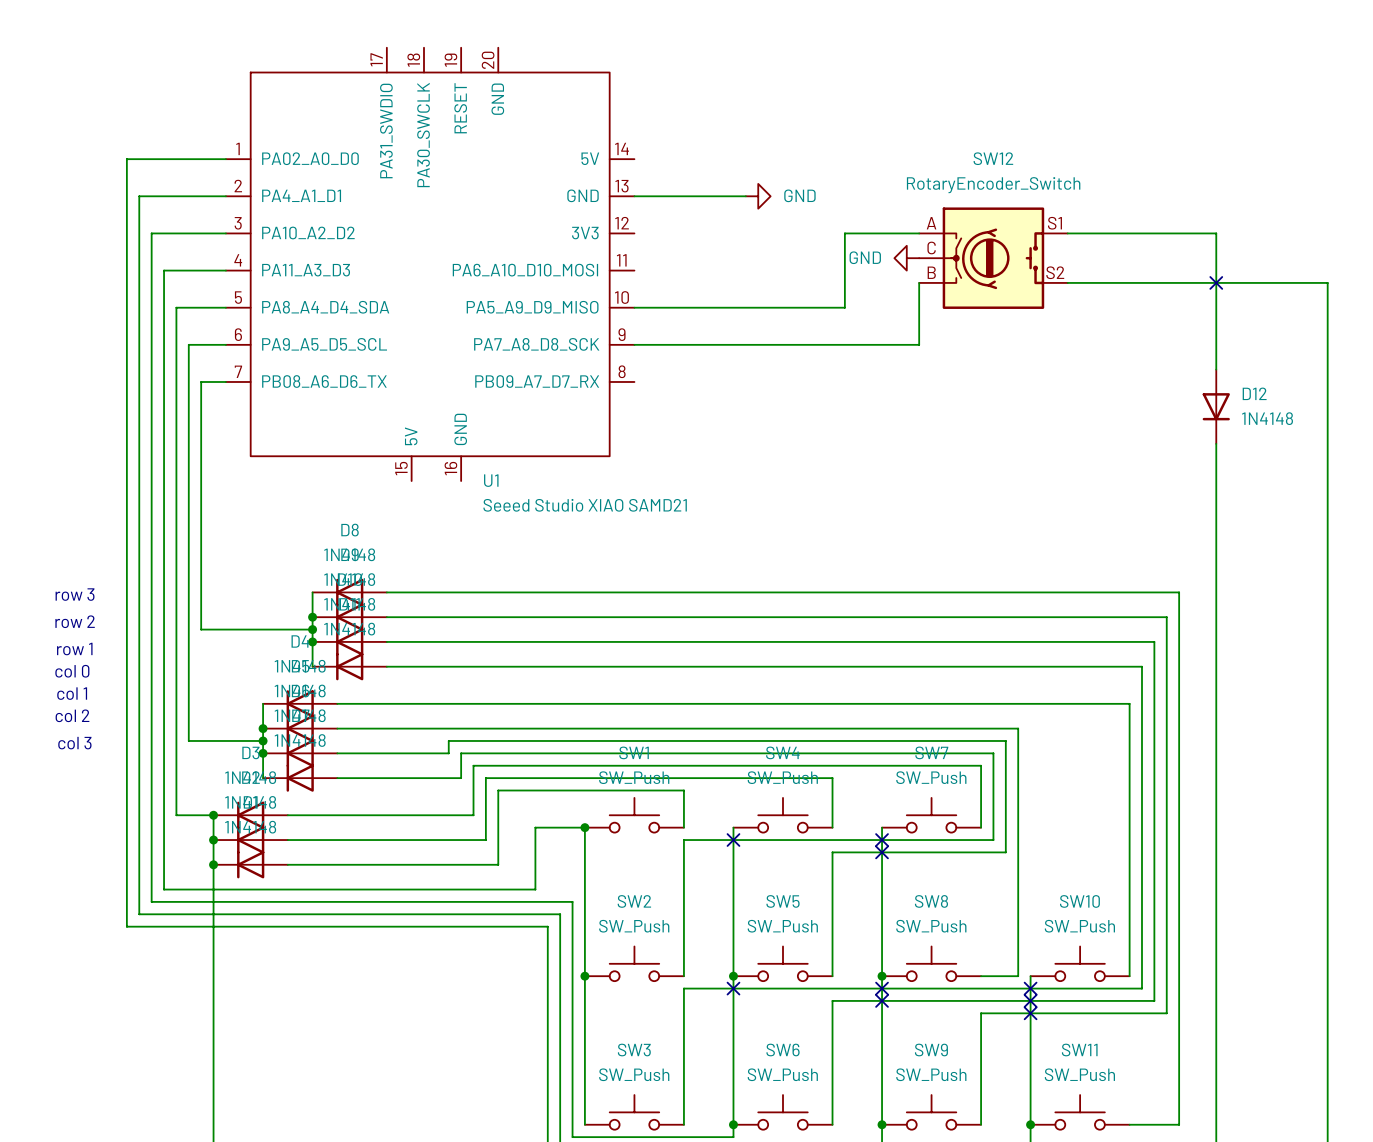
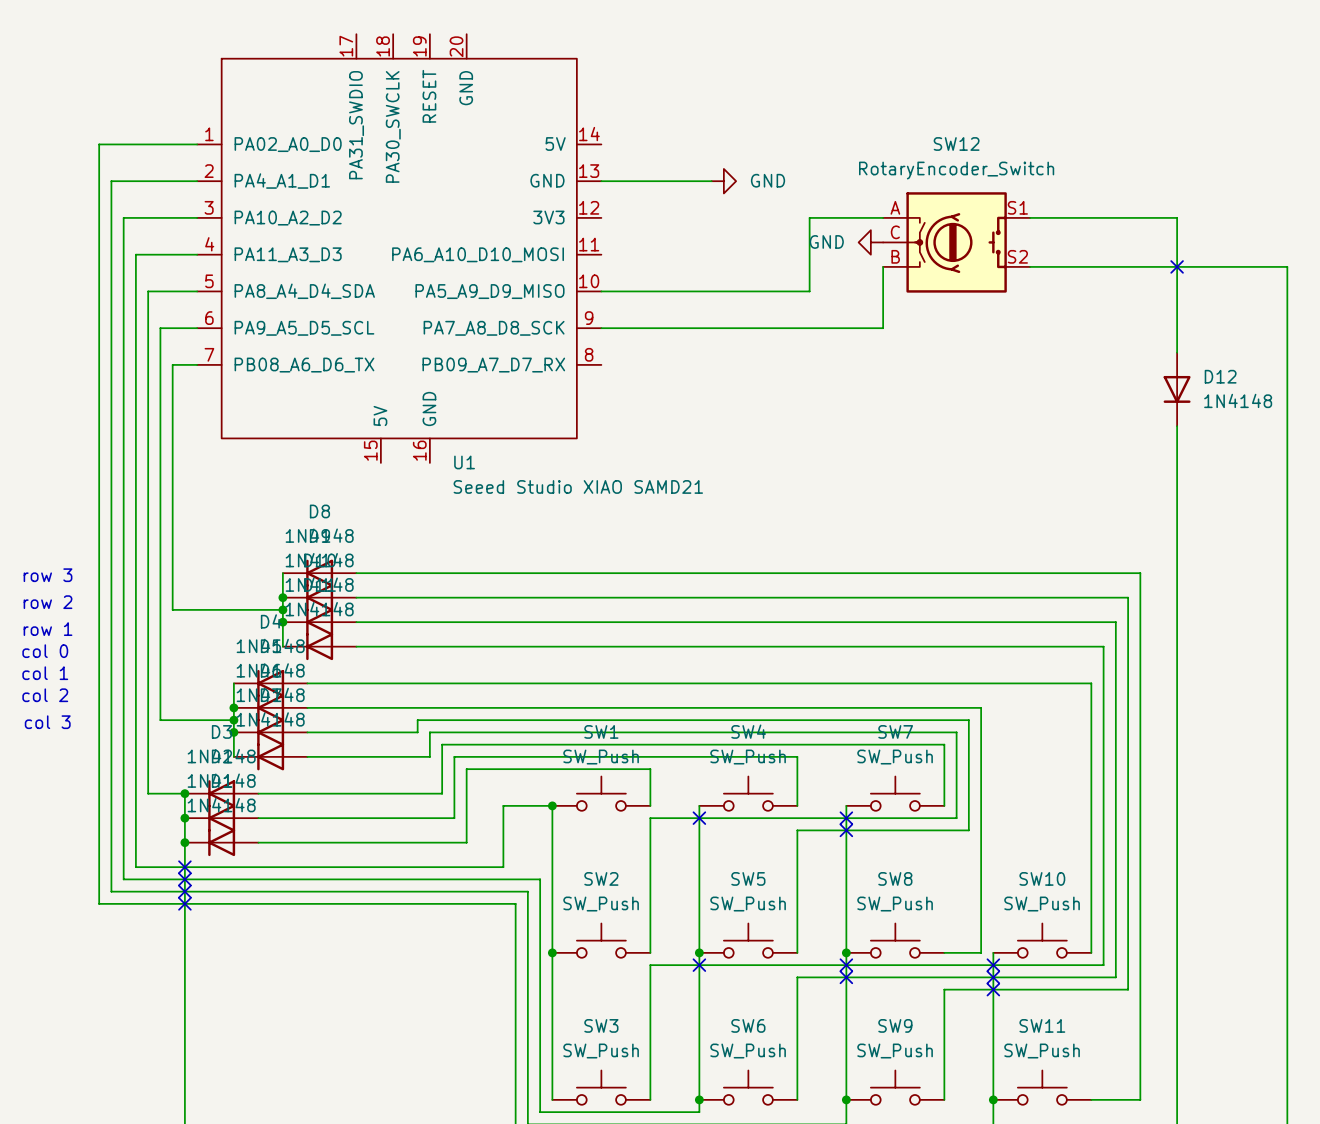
no-connect mark: none -> (184, 867)
no-connect mark: none -> (184, 879)
no-connect mark: none -> (184, 891)
no-connect mark: none -> (184, 903)

